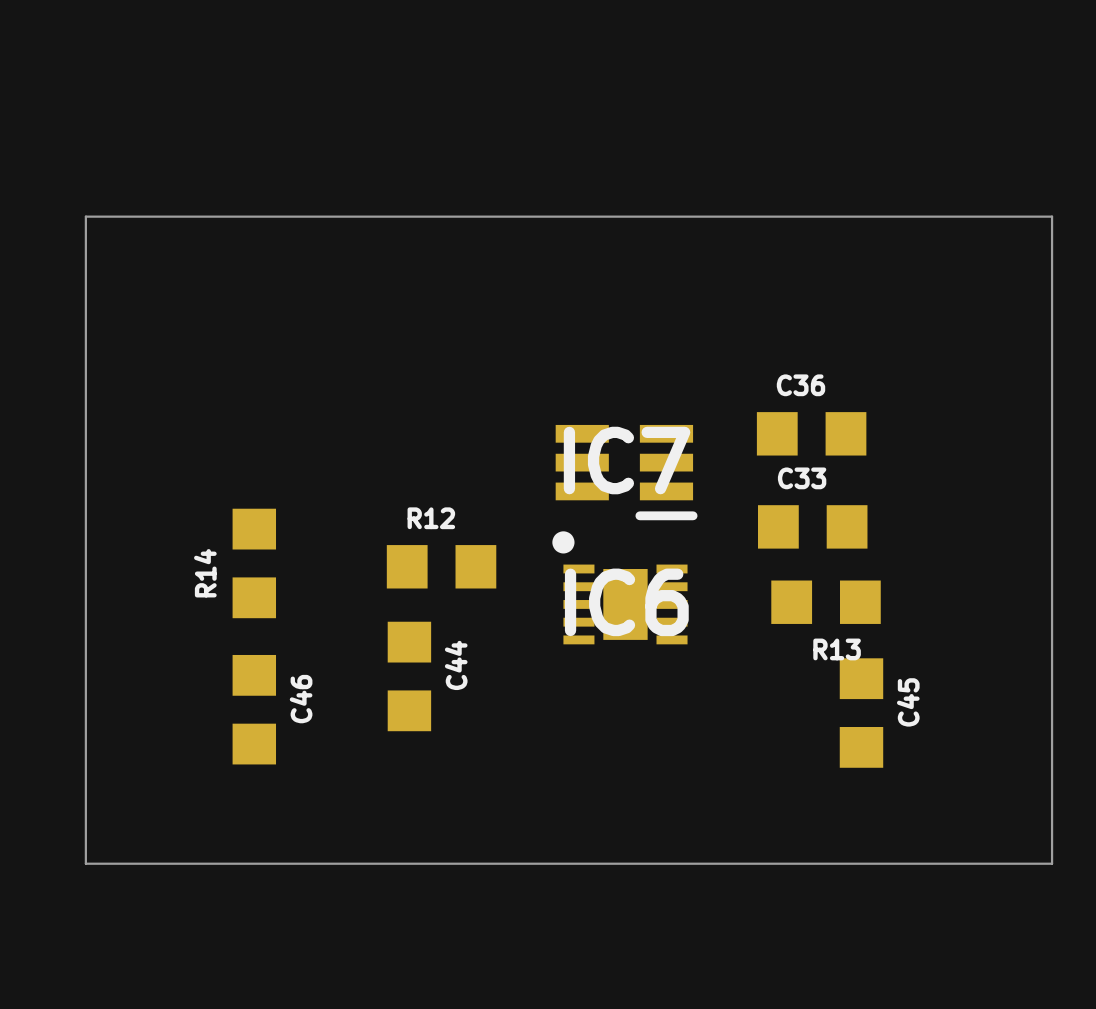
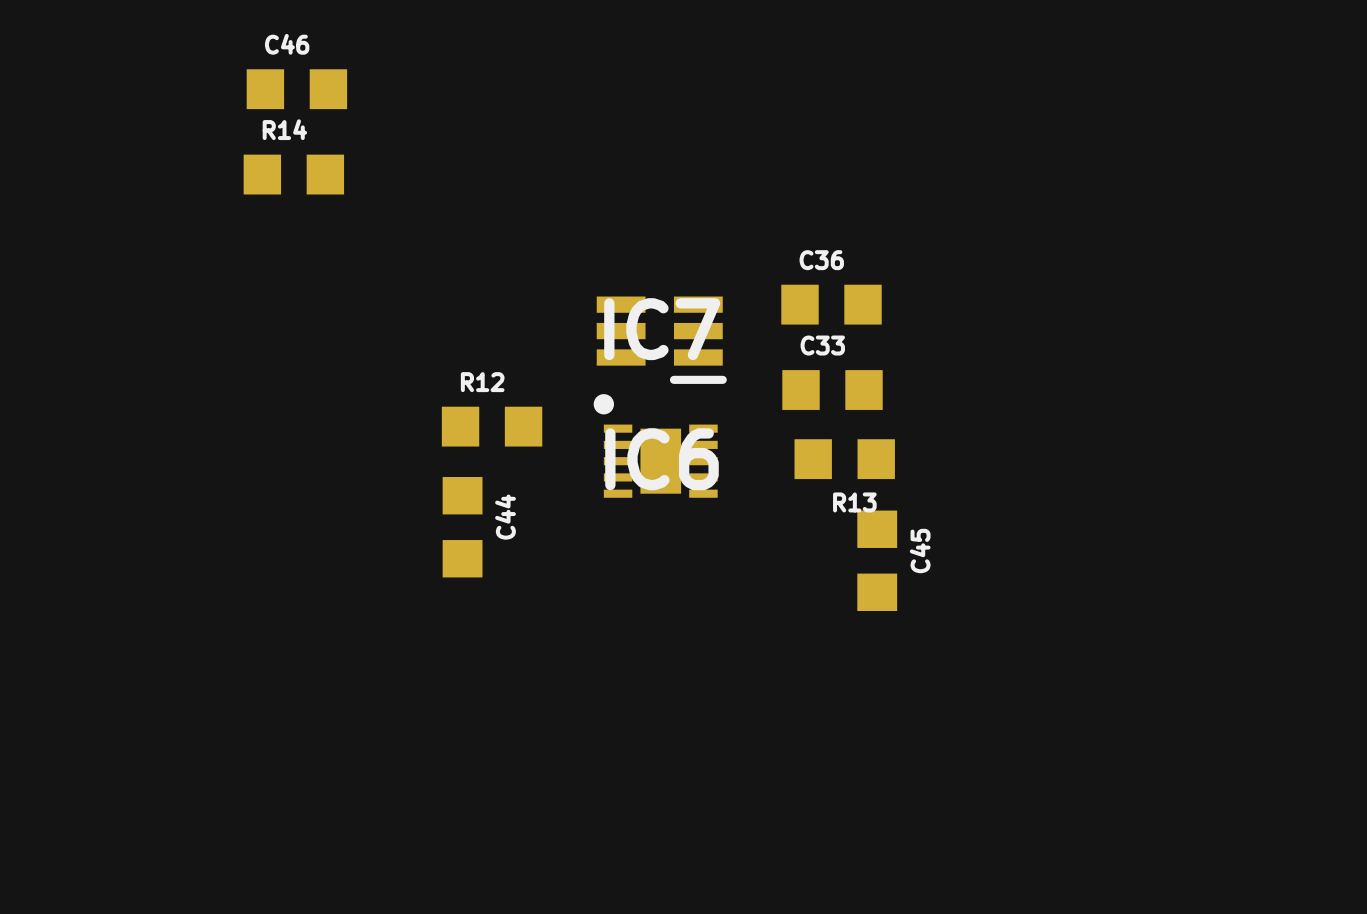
board edge: (85, 216) (1052, 216) (1052, 863) (85, 863) (85, 216) -> none
R14 rotation: 0° (254, 563) -> 90° clockwise (293, 174)
R14 position: (254, 563) -> (293, 174)
C46 rotation: 0° (254, 709) -> 90° clockwise (296, 89)
C46 position: (254, 709) -> (296, 89)

